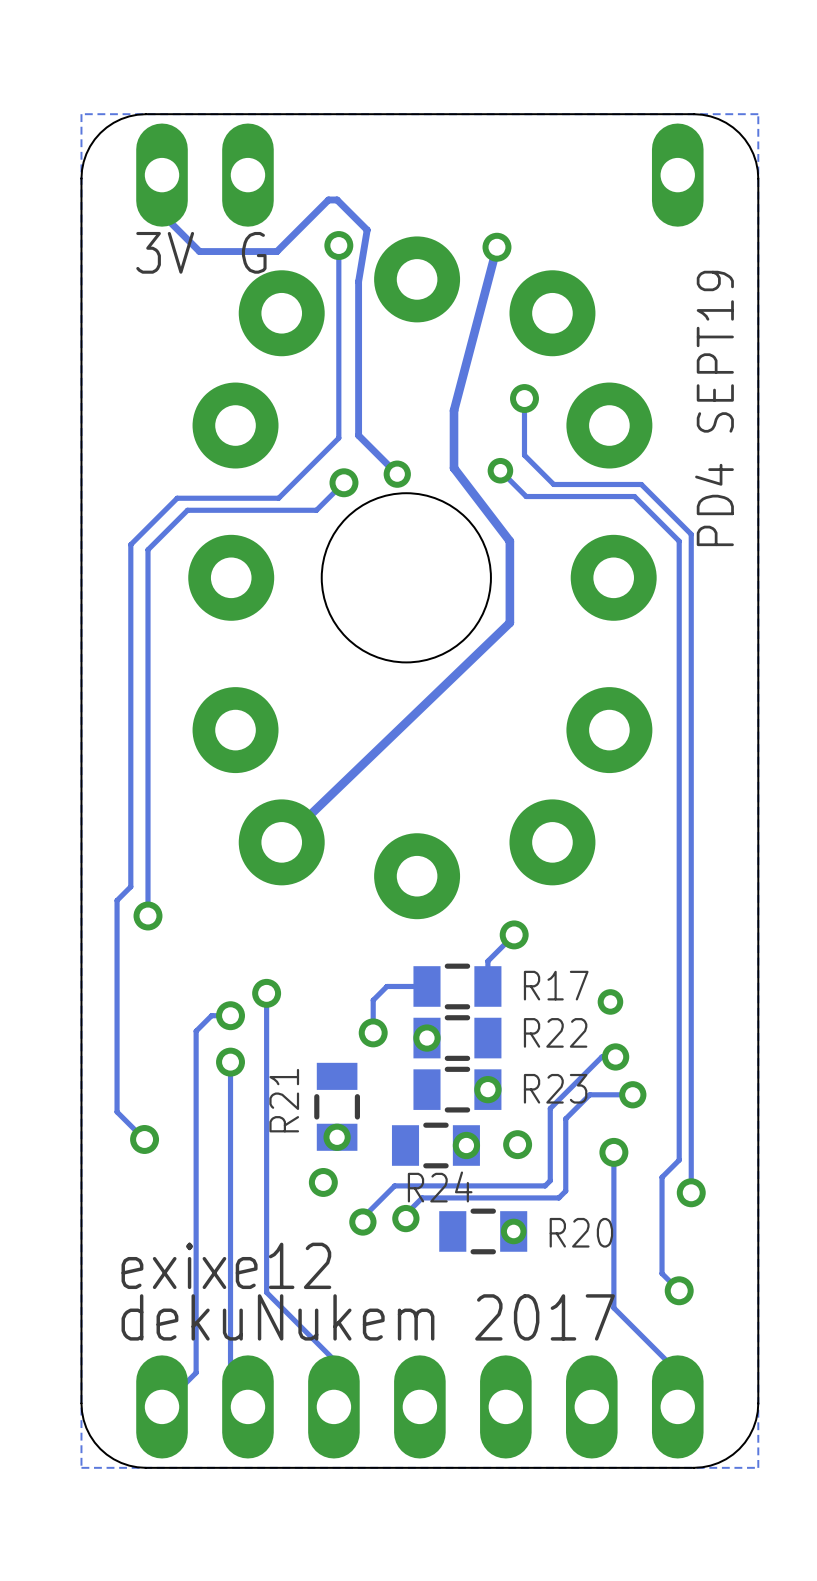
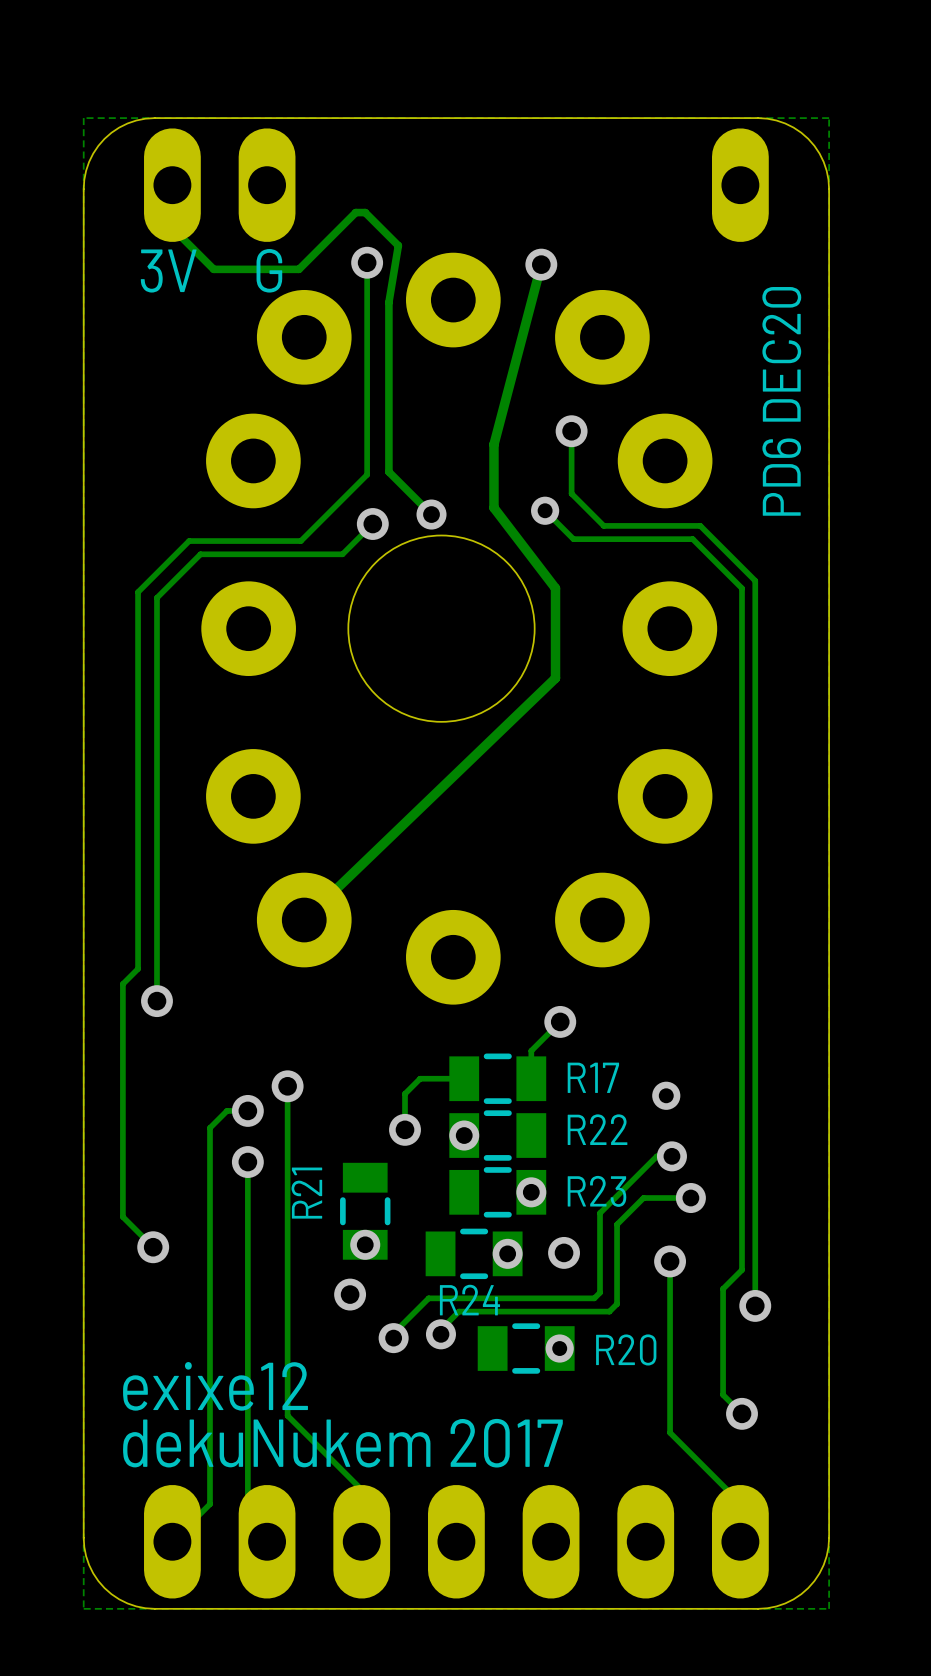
text: PD4 SEPT19 (714, 408) -> PD6 DEC20 (781, 401)

